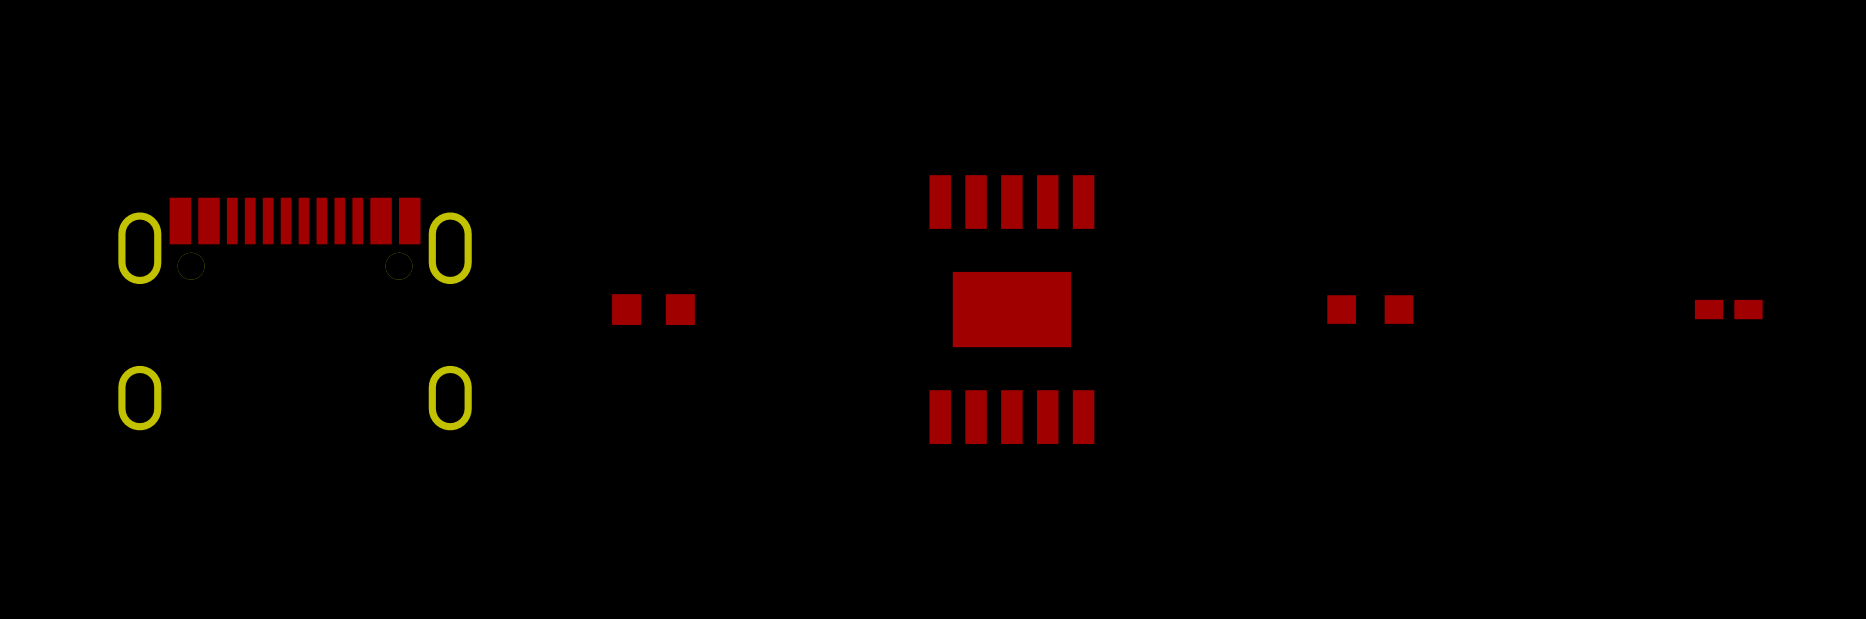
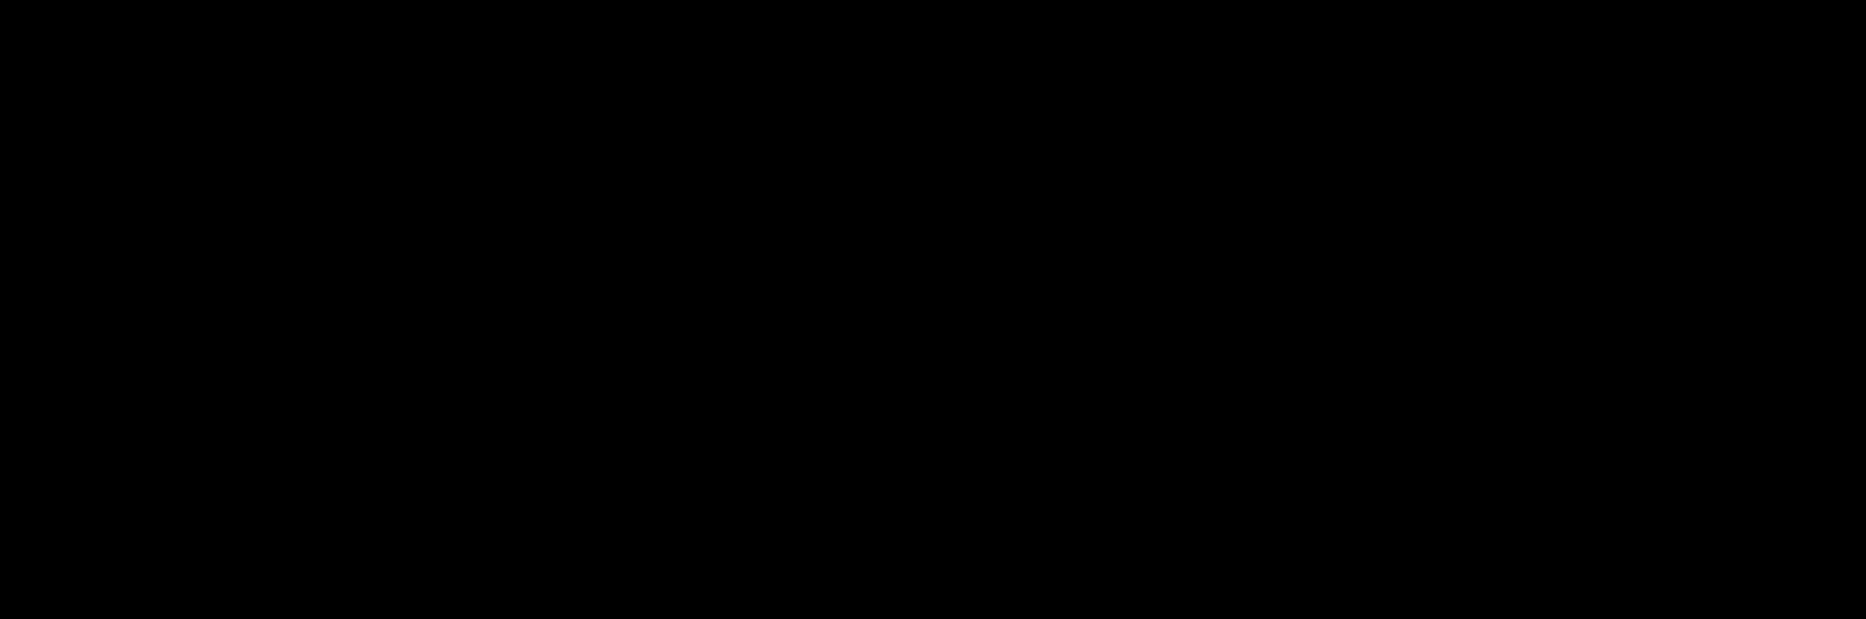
part: (653, 309) -> none
part: (1011, 309) -> none
part: (1370, 309) -> none
part: (1728, 309) -> none
part: (295, 314) -> none

